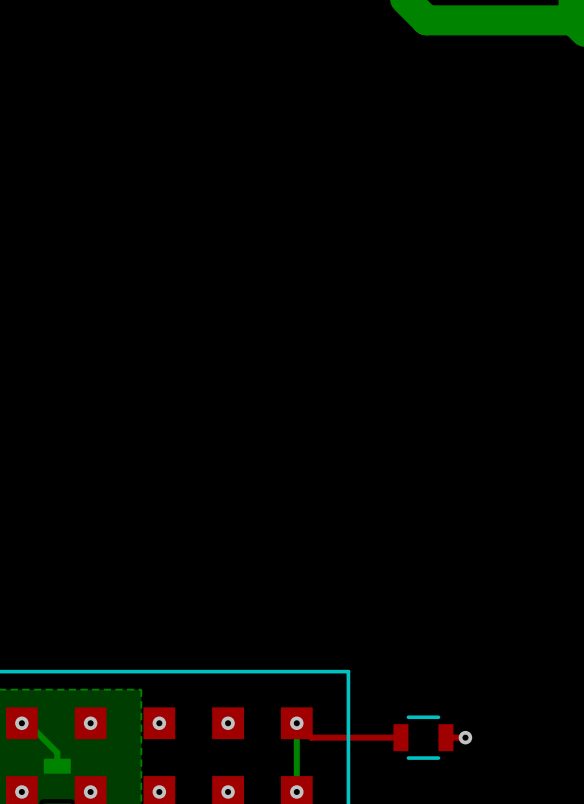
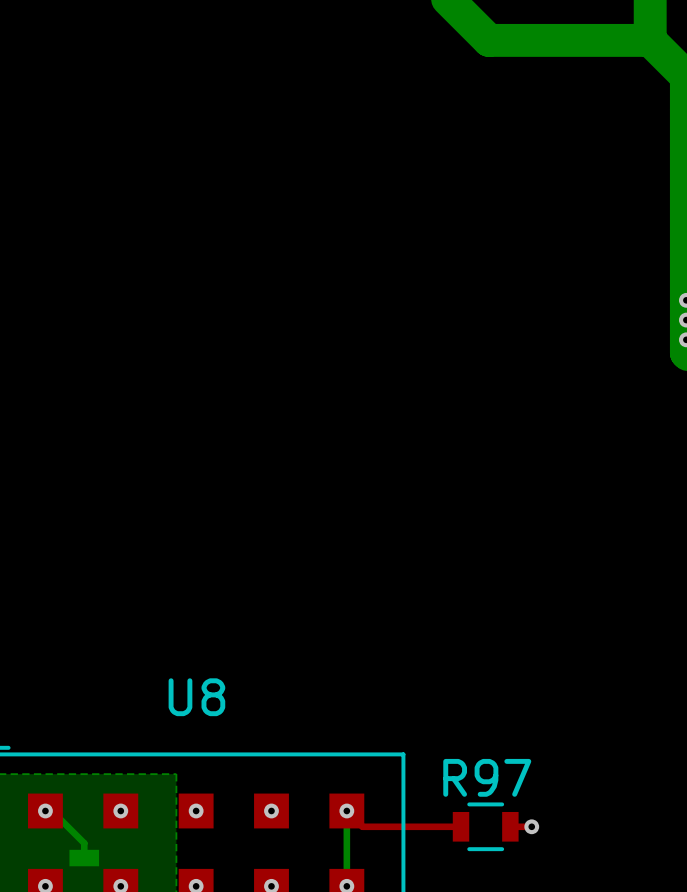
U8 name: none -> U8 (196, 697)
R97 name: none -> R97 (487, 777)

